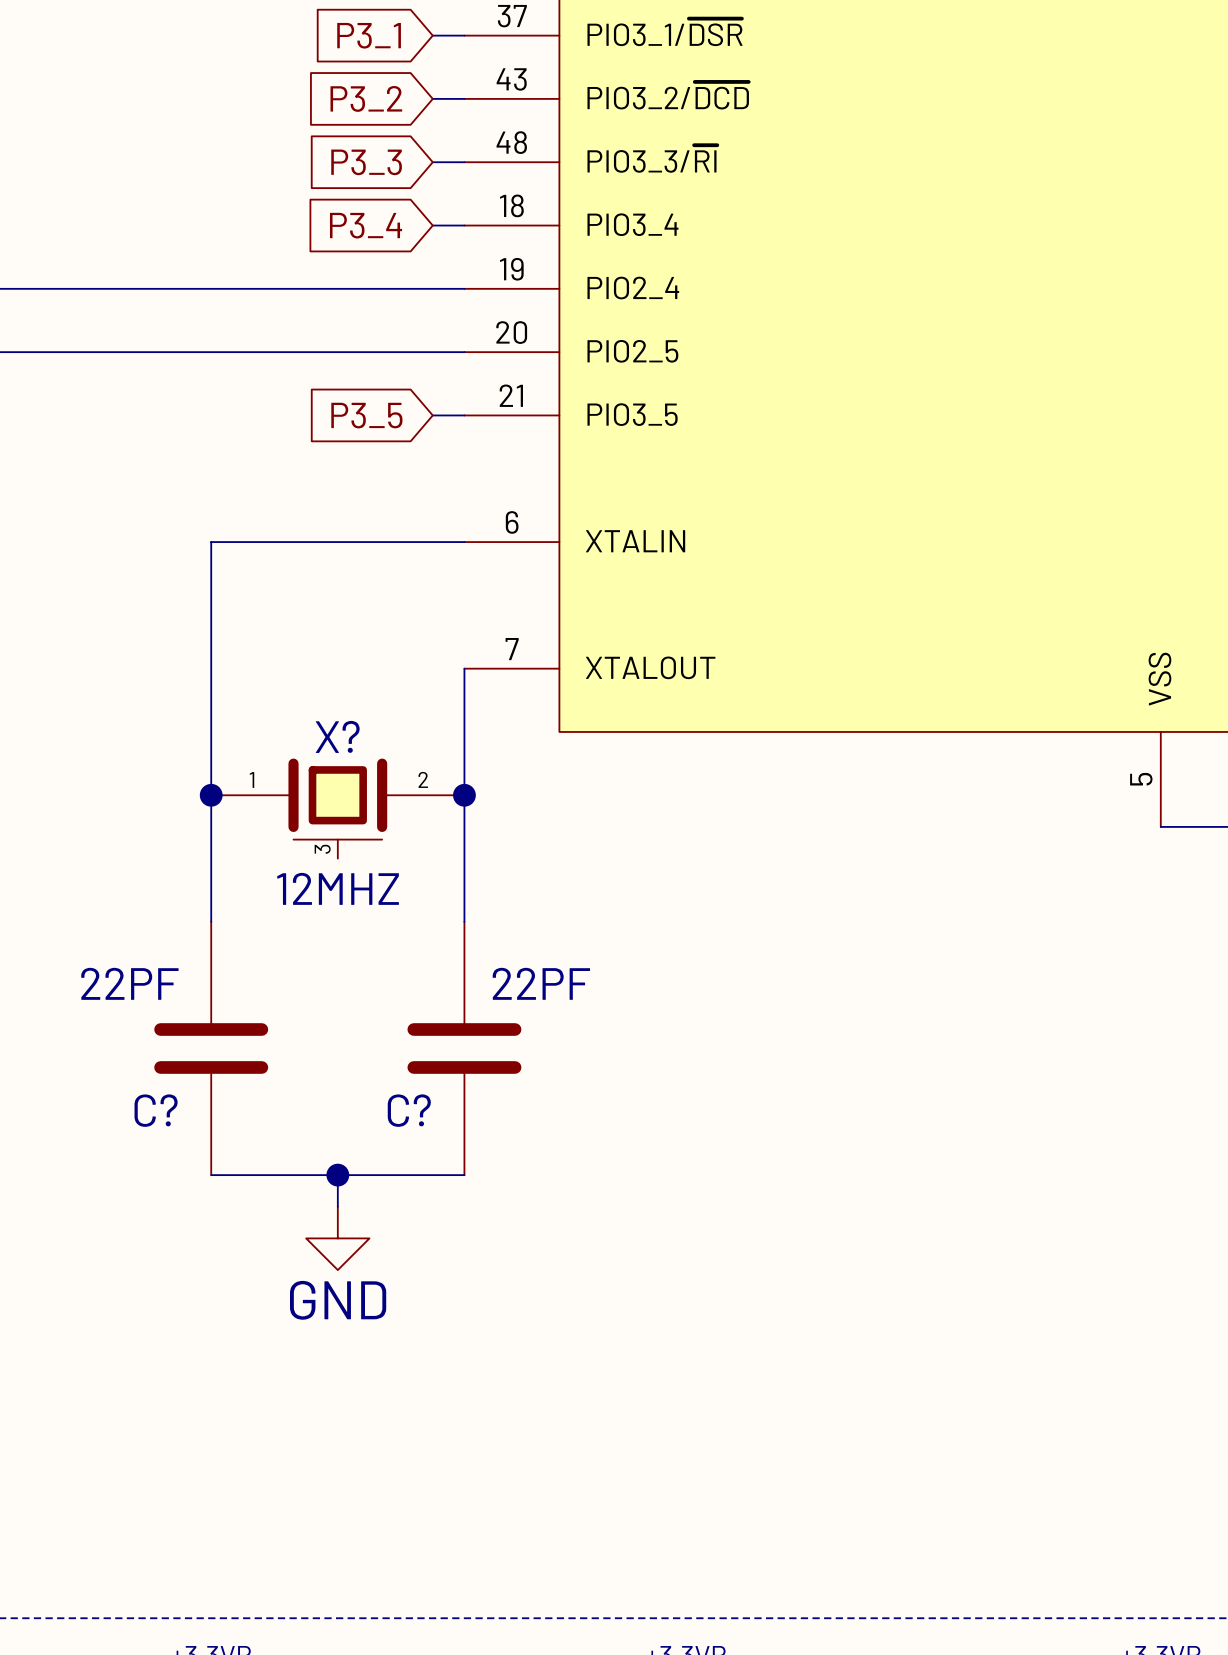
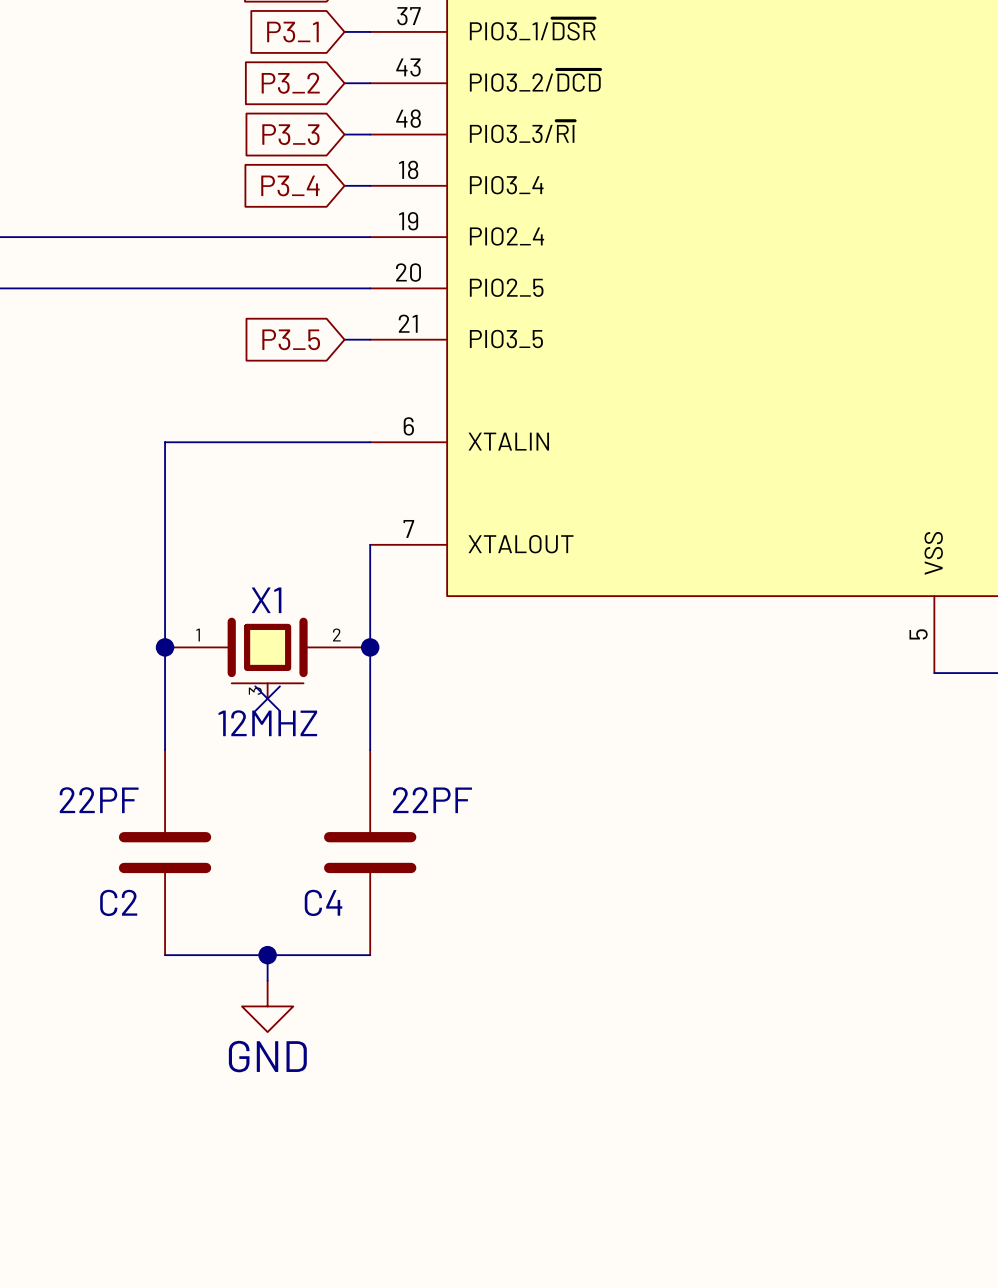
X? name: X? (337, 736) -> X1 (266, 600)
no-connect mark: none -> (267, 698)
C? name: C? (156, 1110) -> C2 (118, 902)
C? name: C? (409, 1110) -> C4 (323, 902)

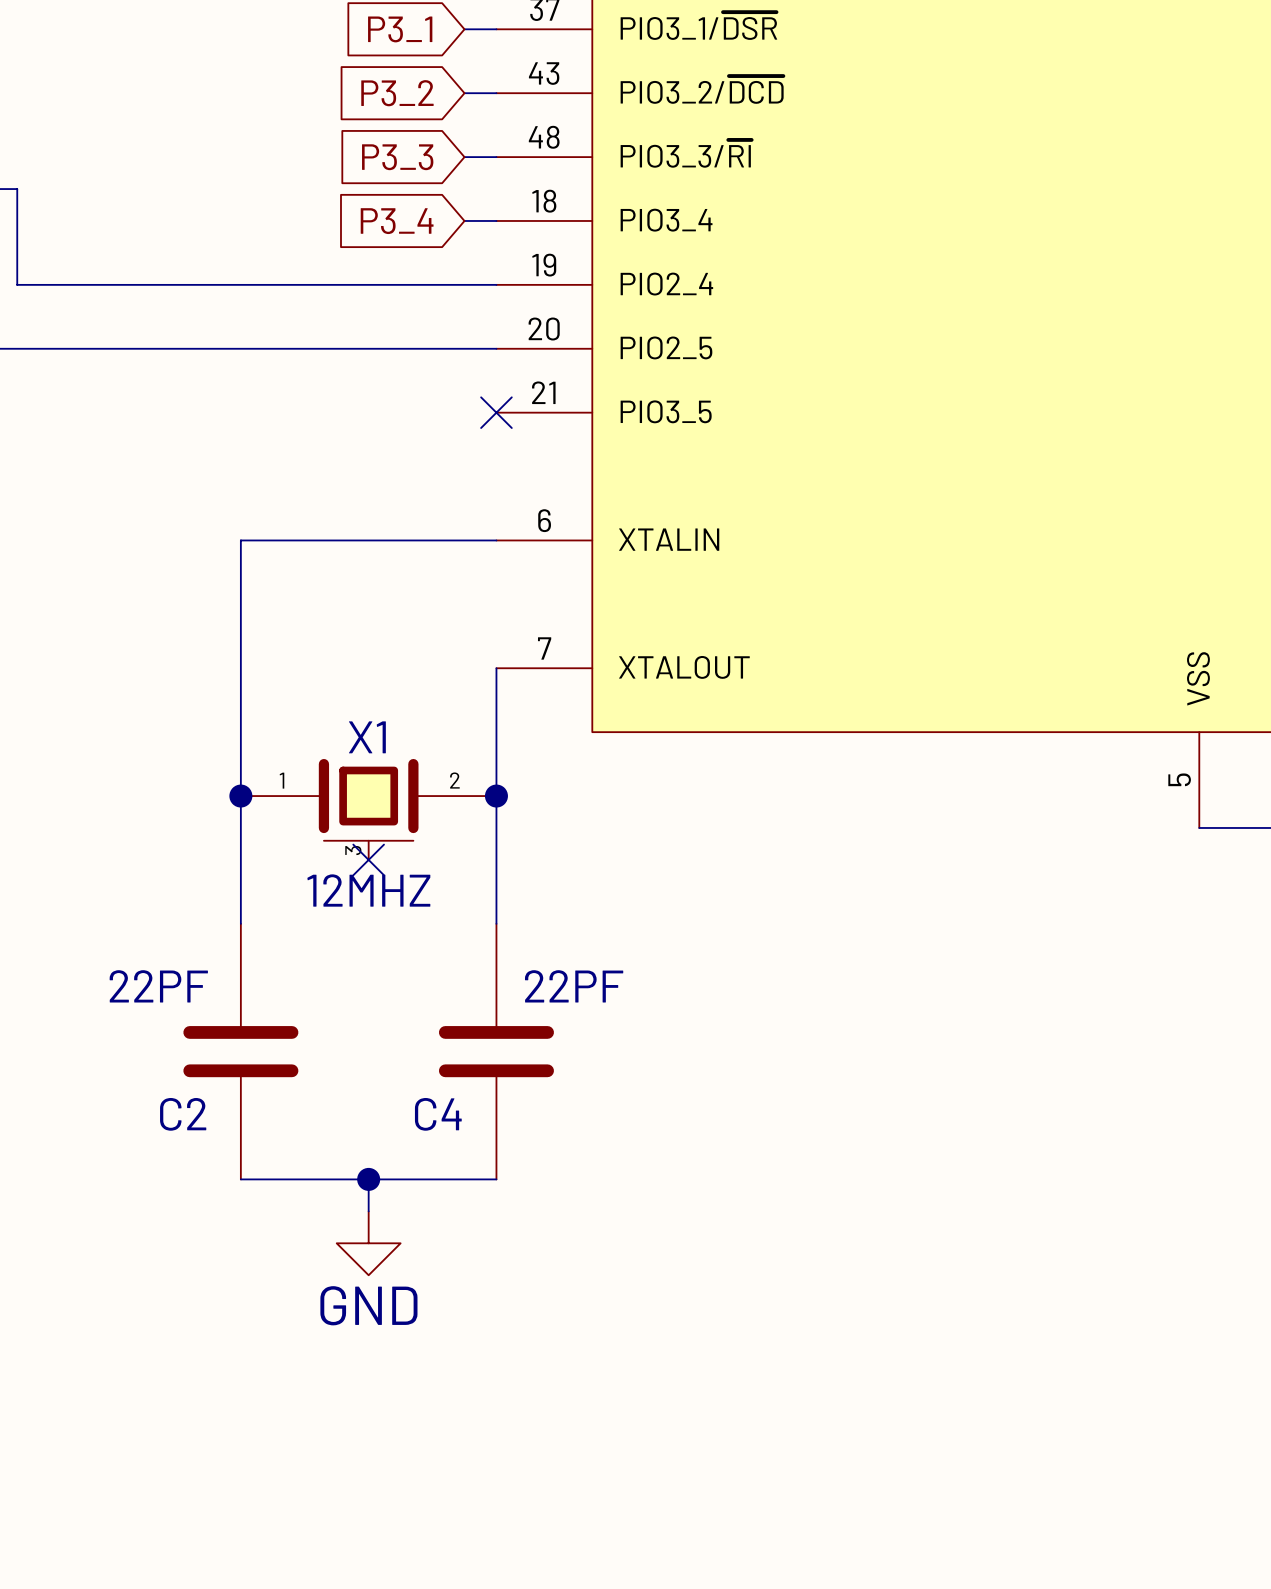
global label: P3_5 (291, 339) -> none
wire: (344, 339) (370, 339) -> none
no-connect mark: none -> (496, 412)

